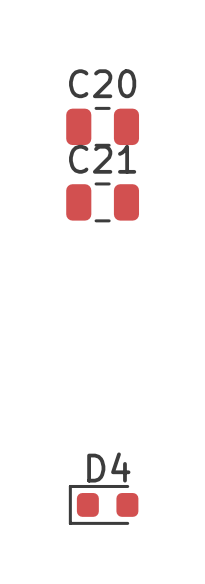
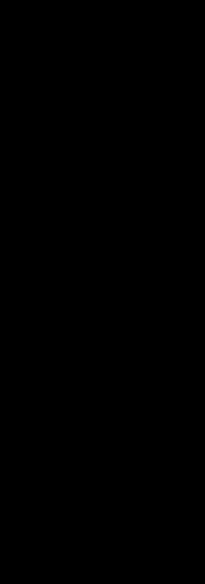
C20: (102, 126) -> none
C21: (102, 202) -> none
D4: (103, 504) -> none

